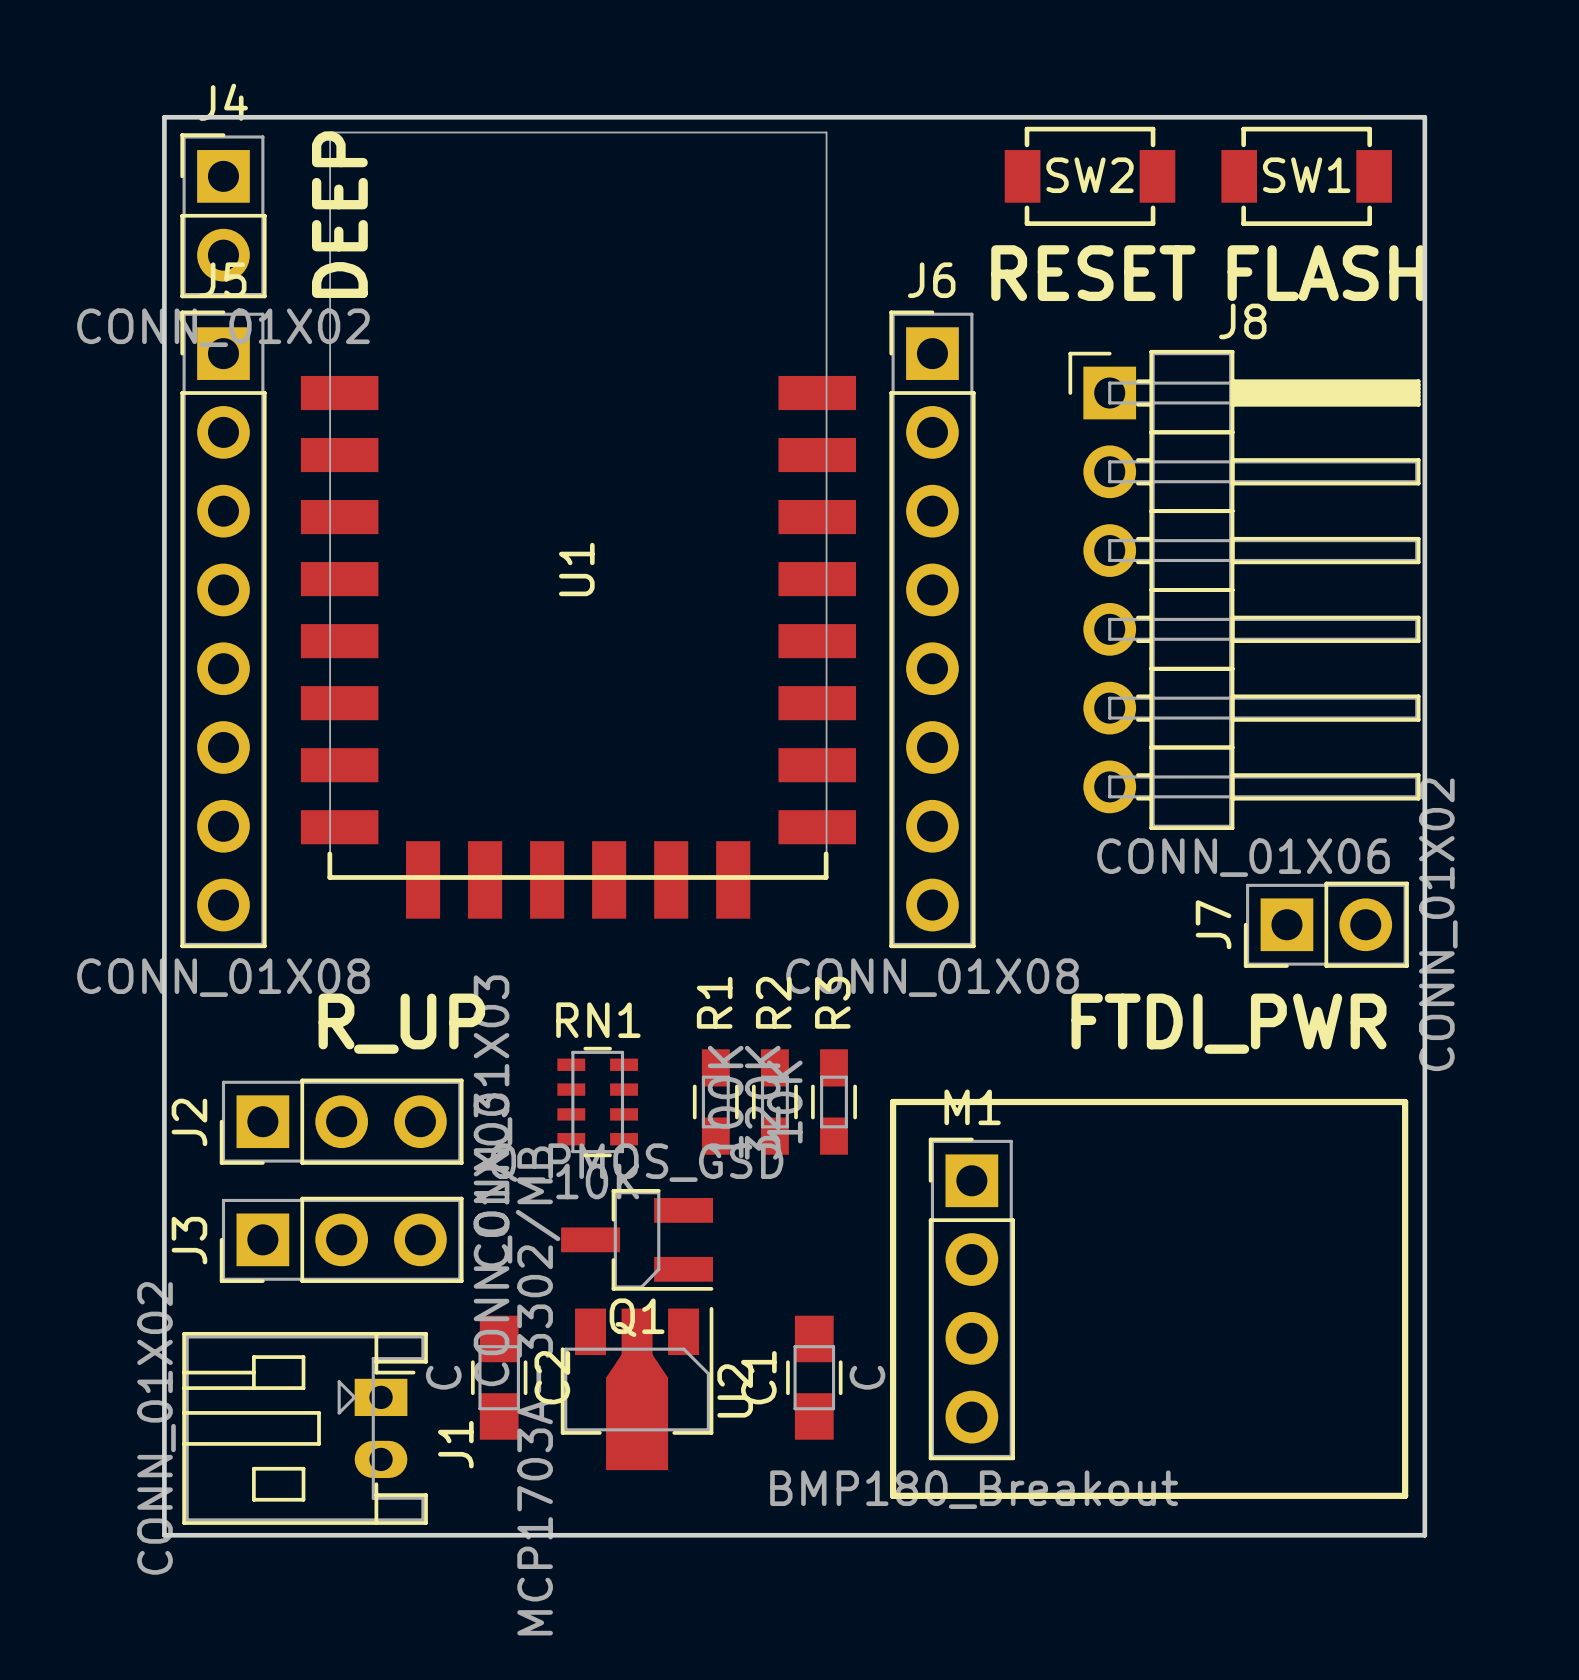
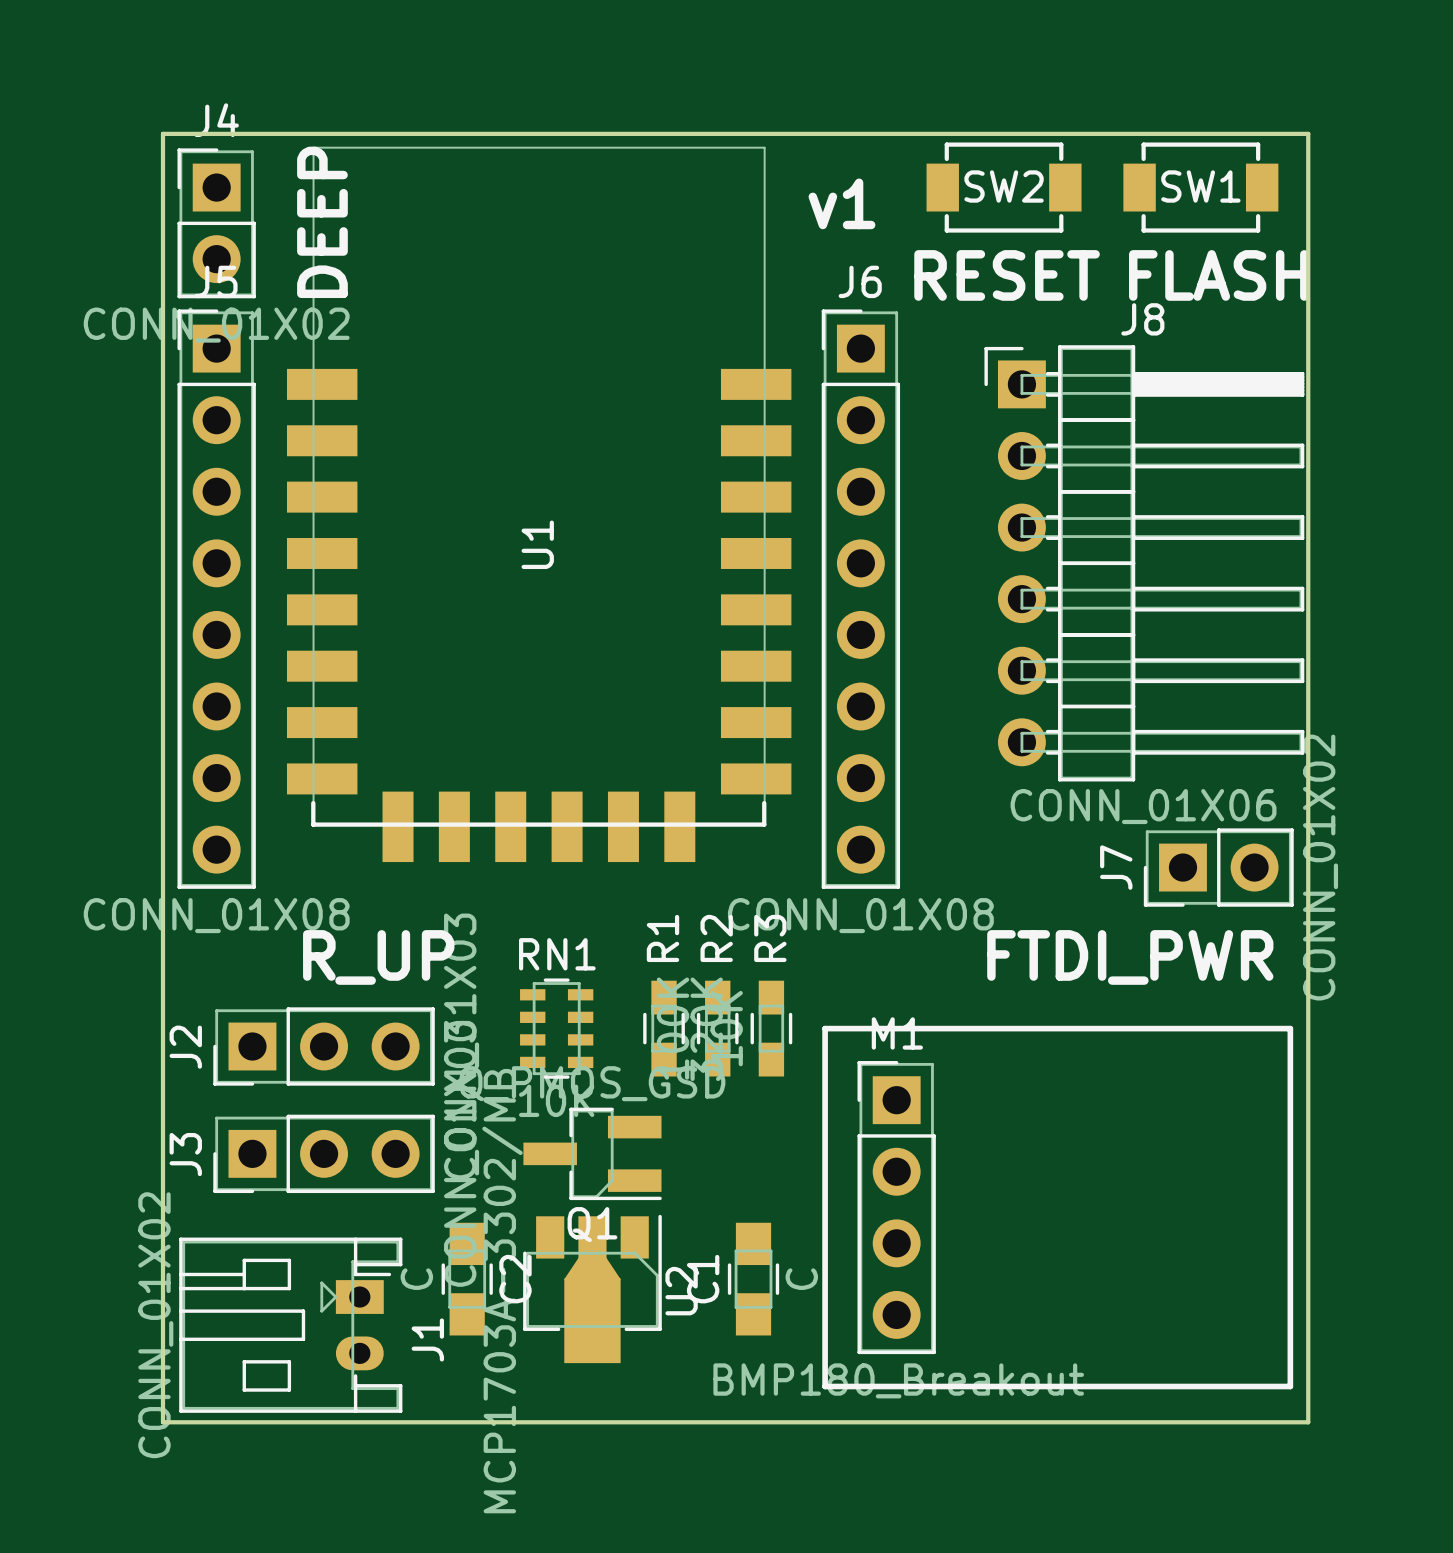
text: none -> v1 (841, 203)

